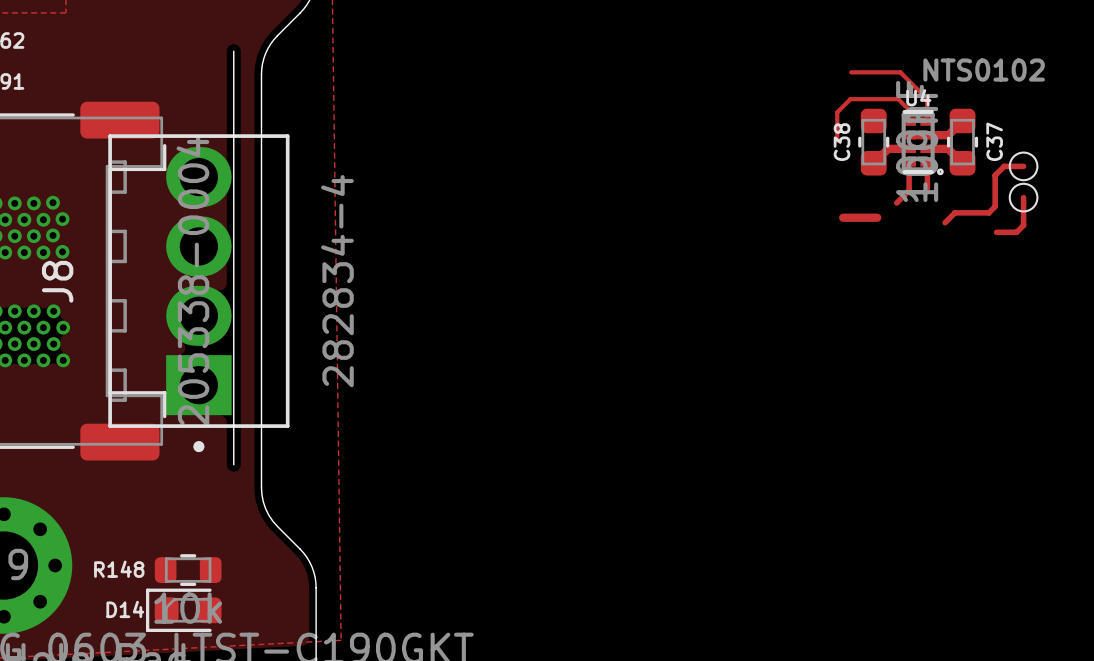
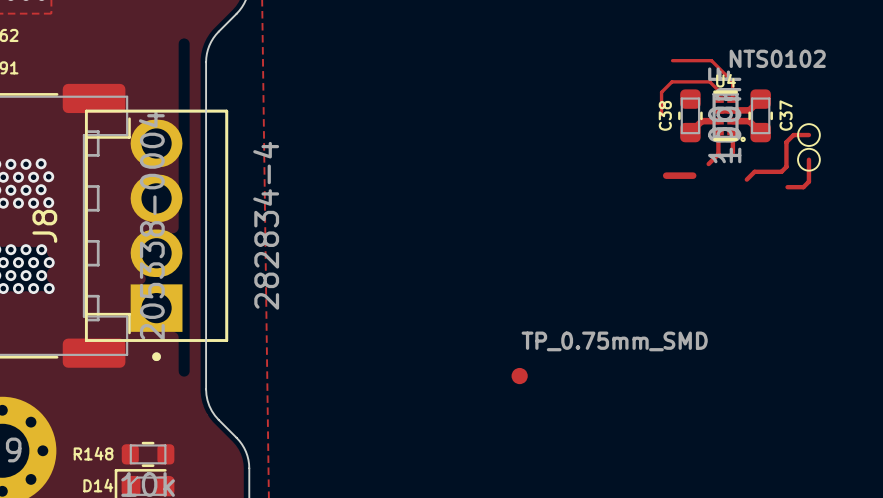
board edge: (233, 51) (233, 464) -> none
part: none -> TP_0.75mm_SMD (519, 376)

